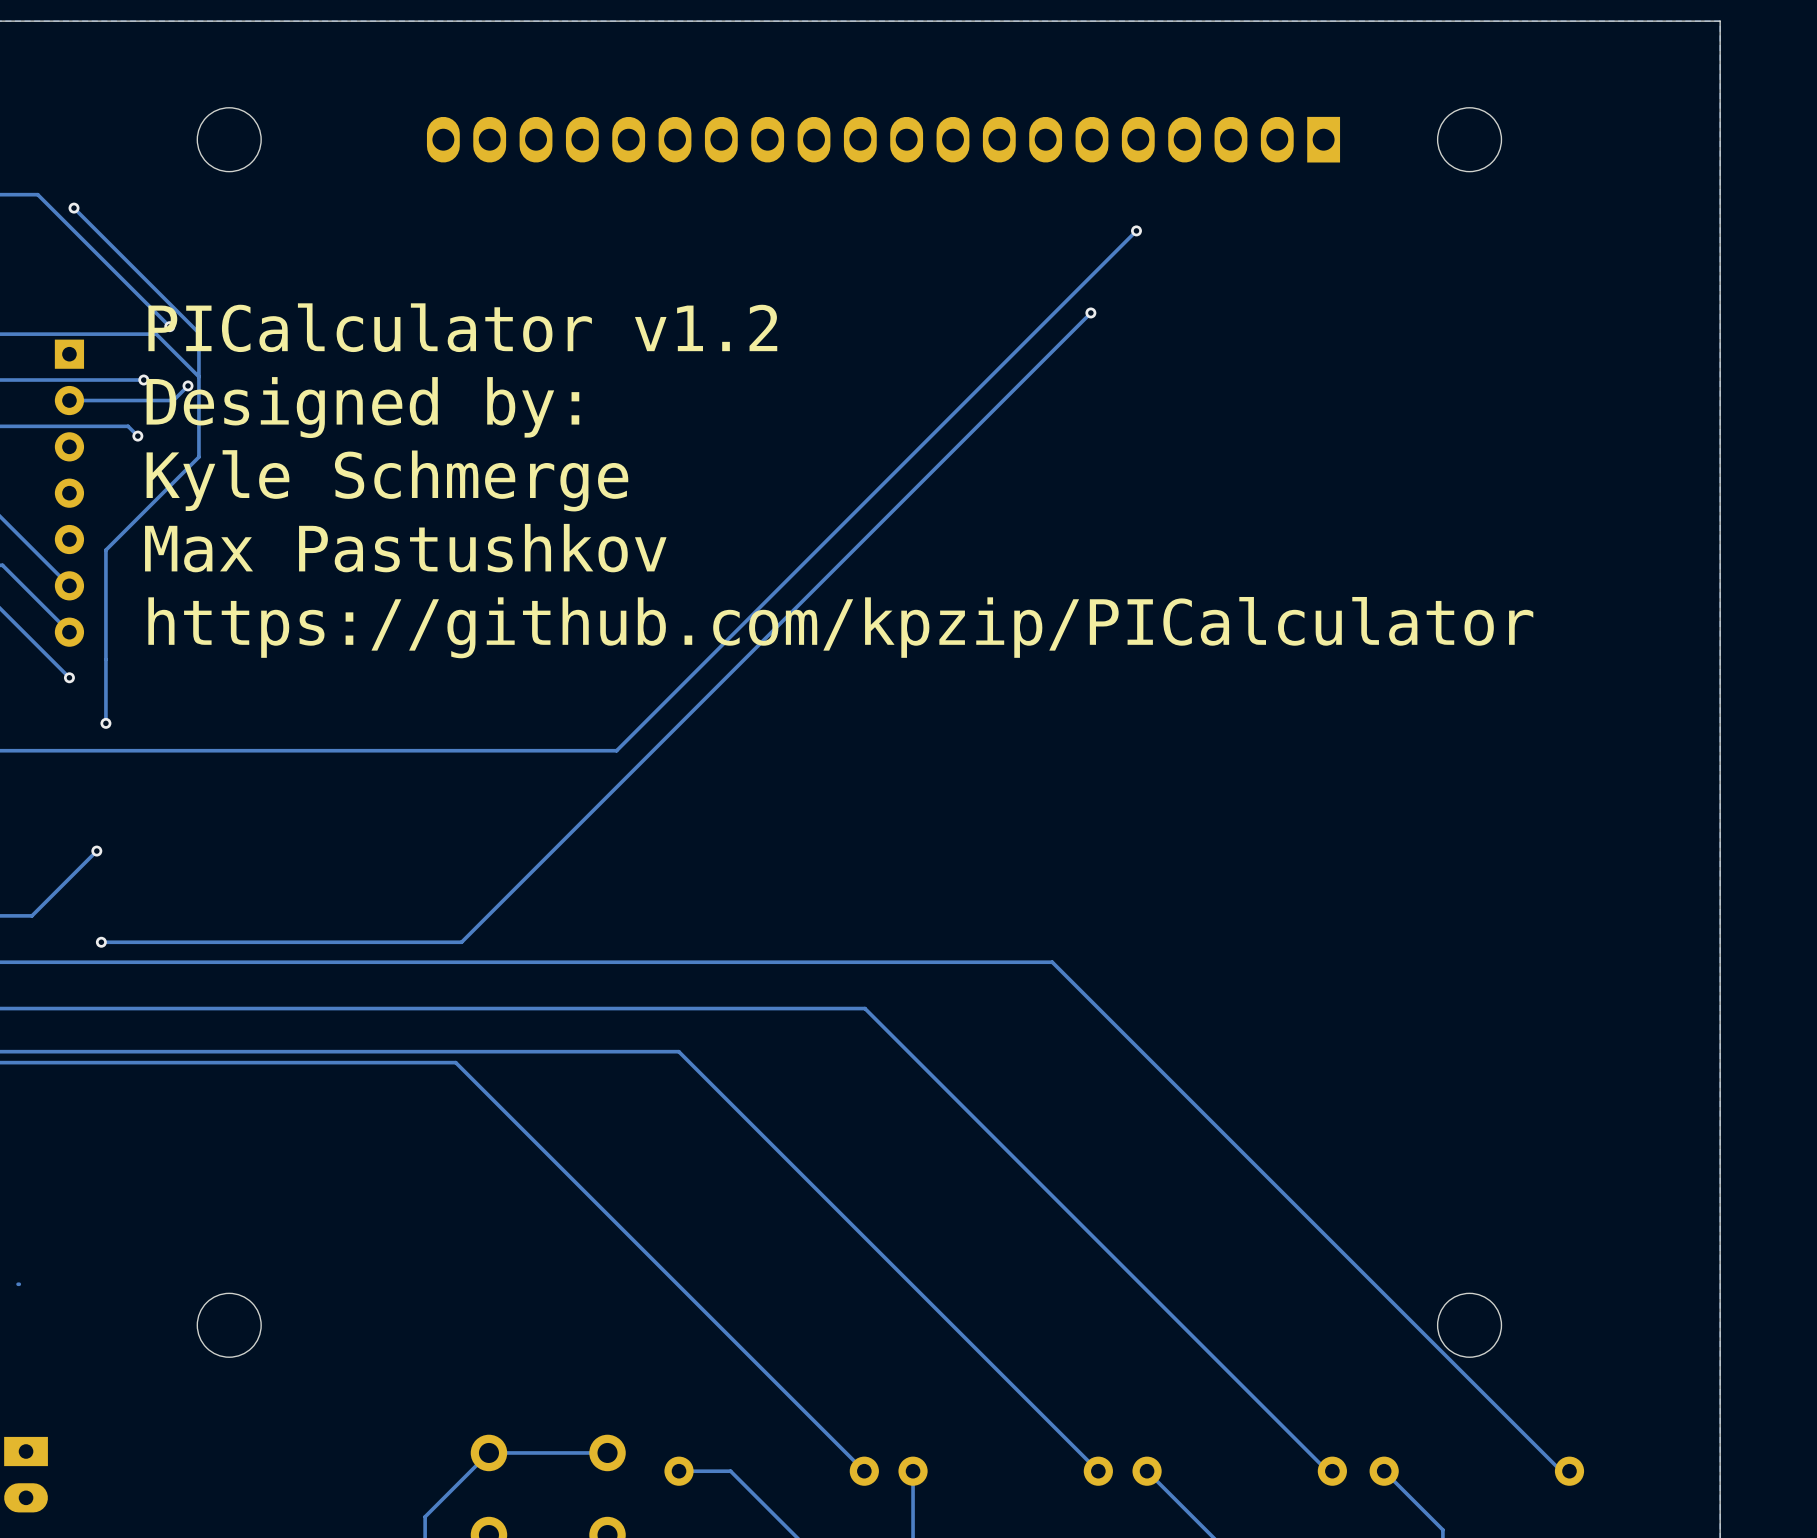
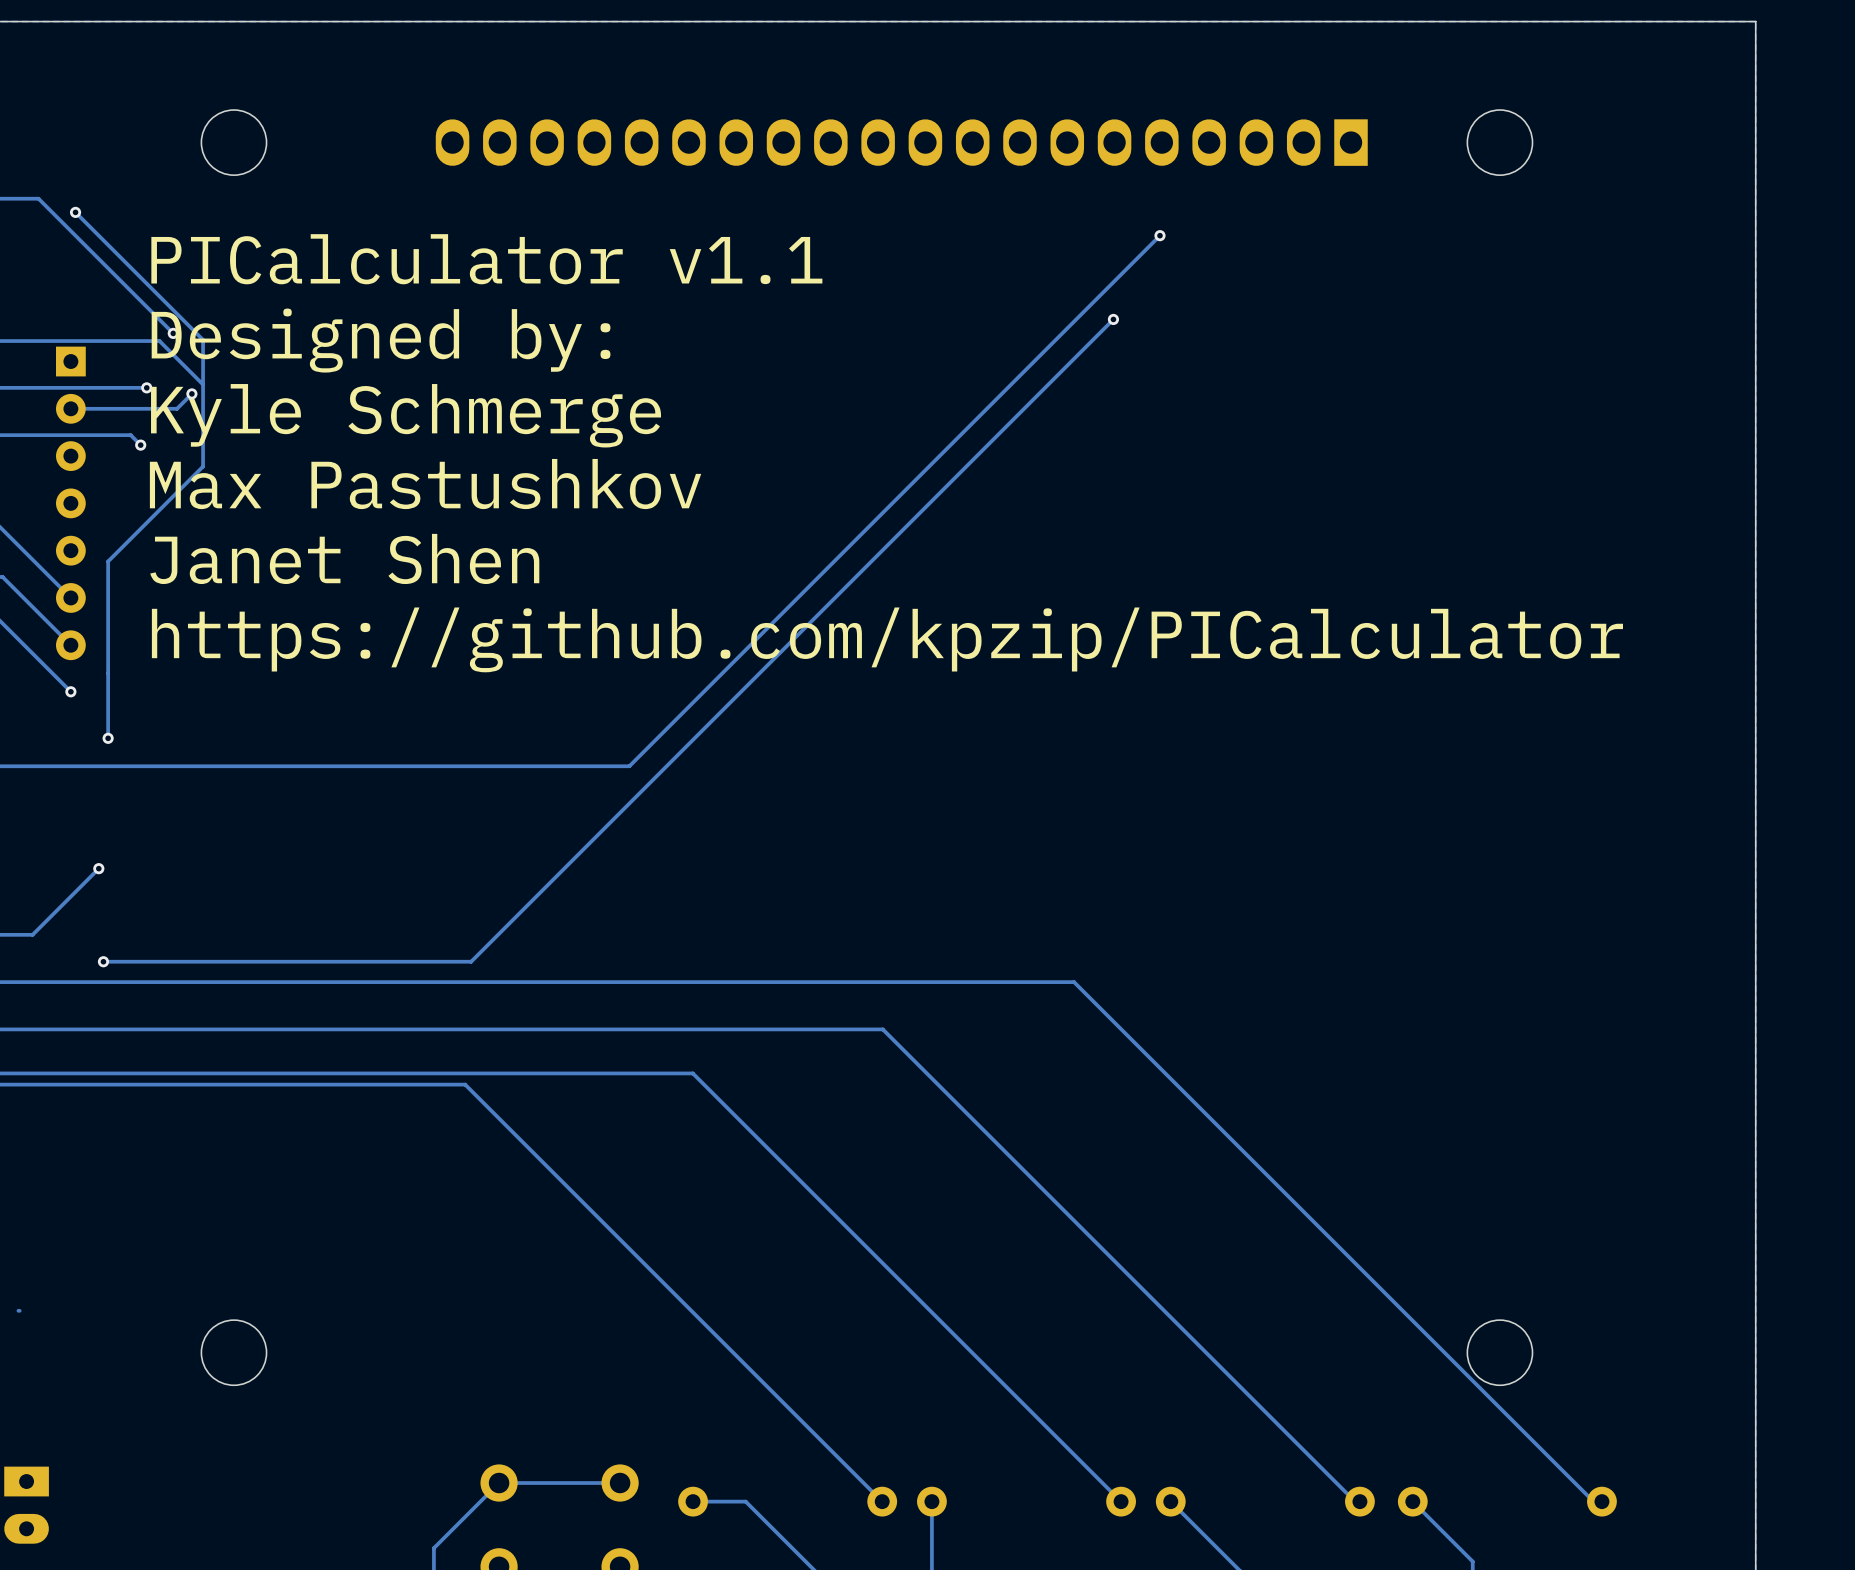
text: none -> PICalculator v1.1 (486, 259)
text: PICalculator v1.2 (462, 327) -> Designed by: (381, 340)
text: Designed by: (362, 407) -> Kyle Schmerge (406, 415)
text: Kyle Schmerge (387, 480) -> Max Pastushkov (425, 484)
text: Max Pastushkov (405, 548) -> Janet Shen (344, 558)

